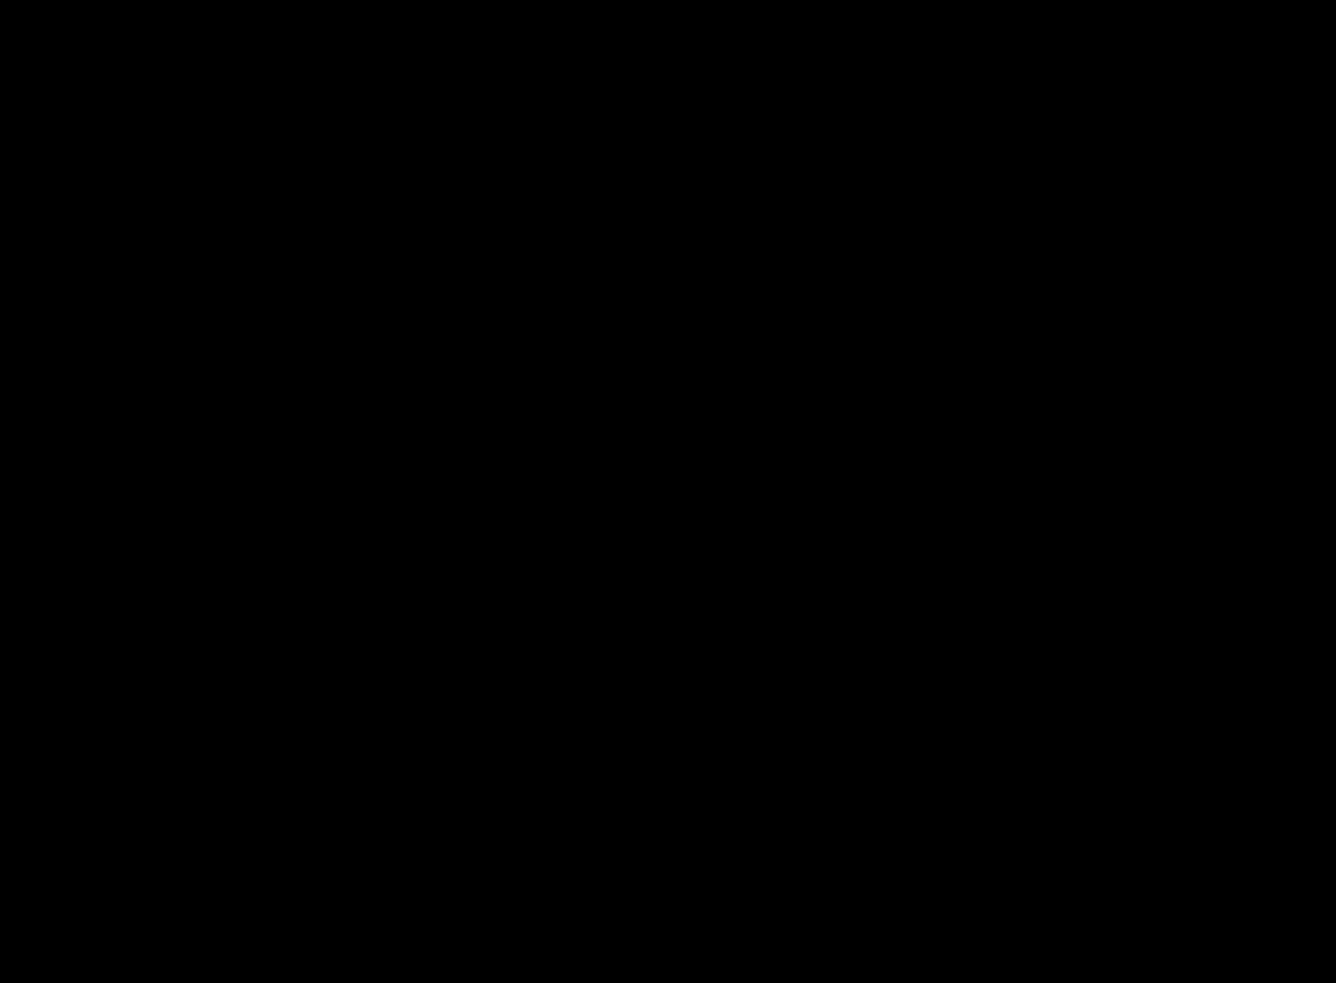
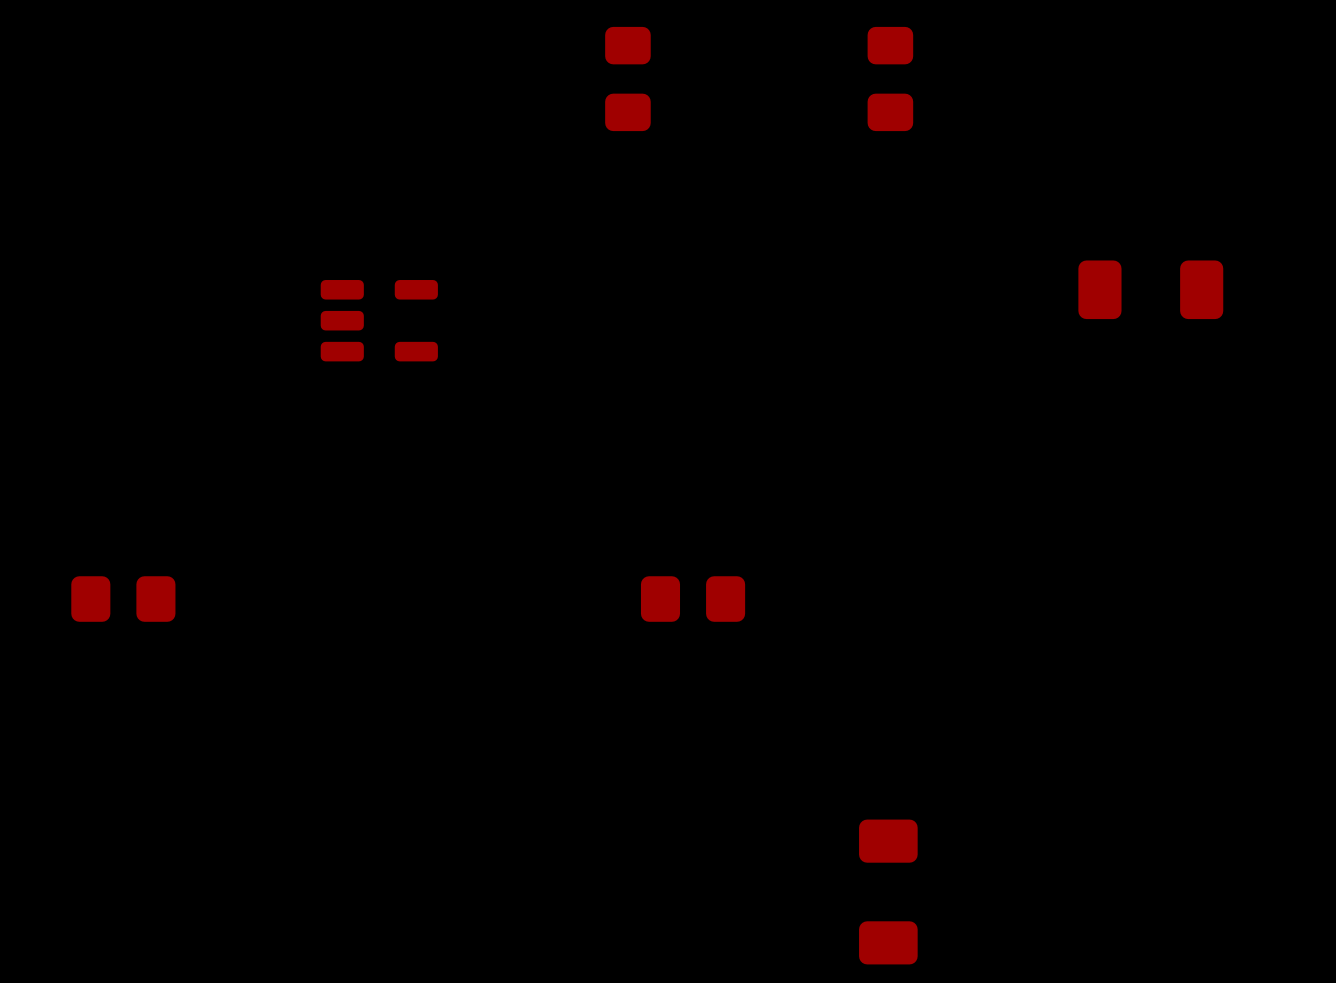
part: none -> (627, 78)
part: none -> (890, 78)
part: none -> (1150, 289)
part: none -> (379, 320)
part: none -> (123, 599)
part: none -> (693, 599)
part: none -> (888, 892)

